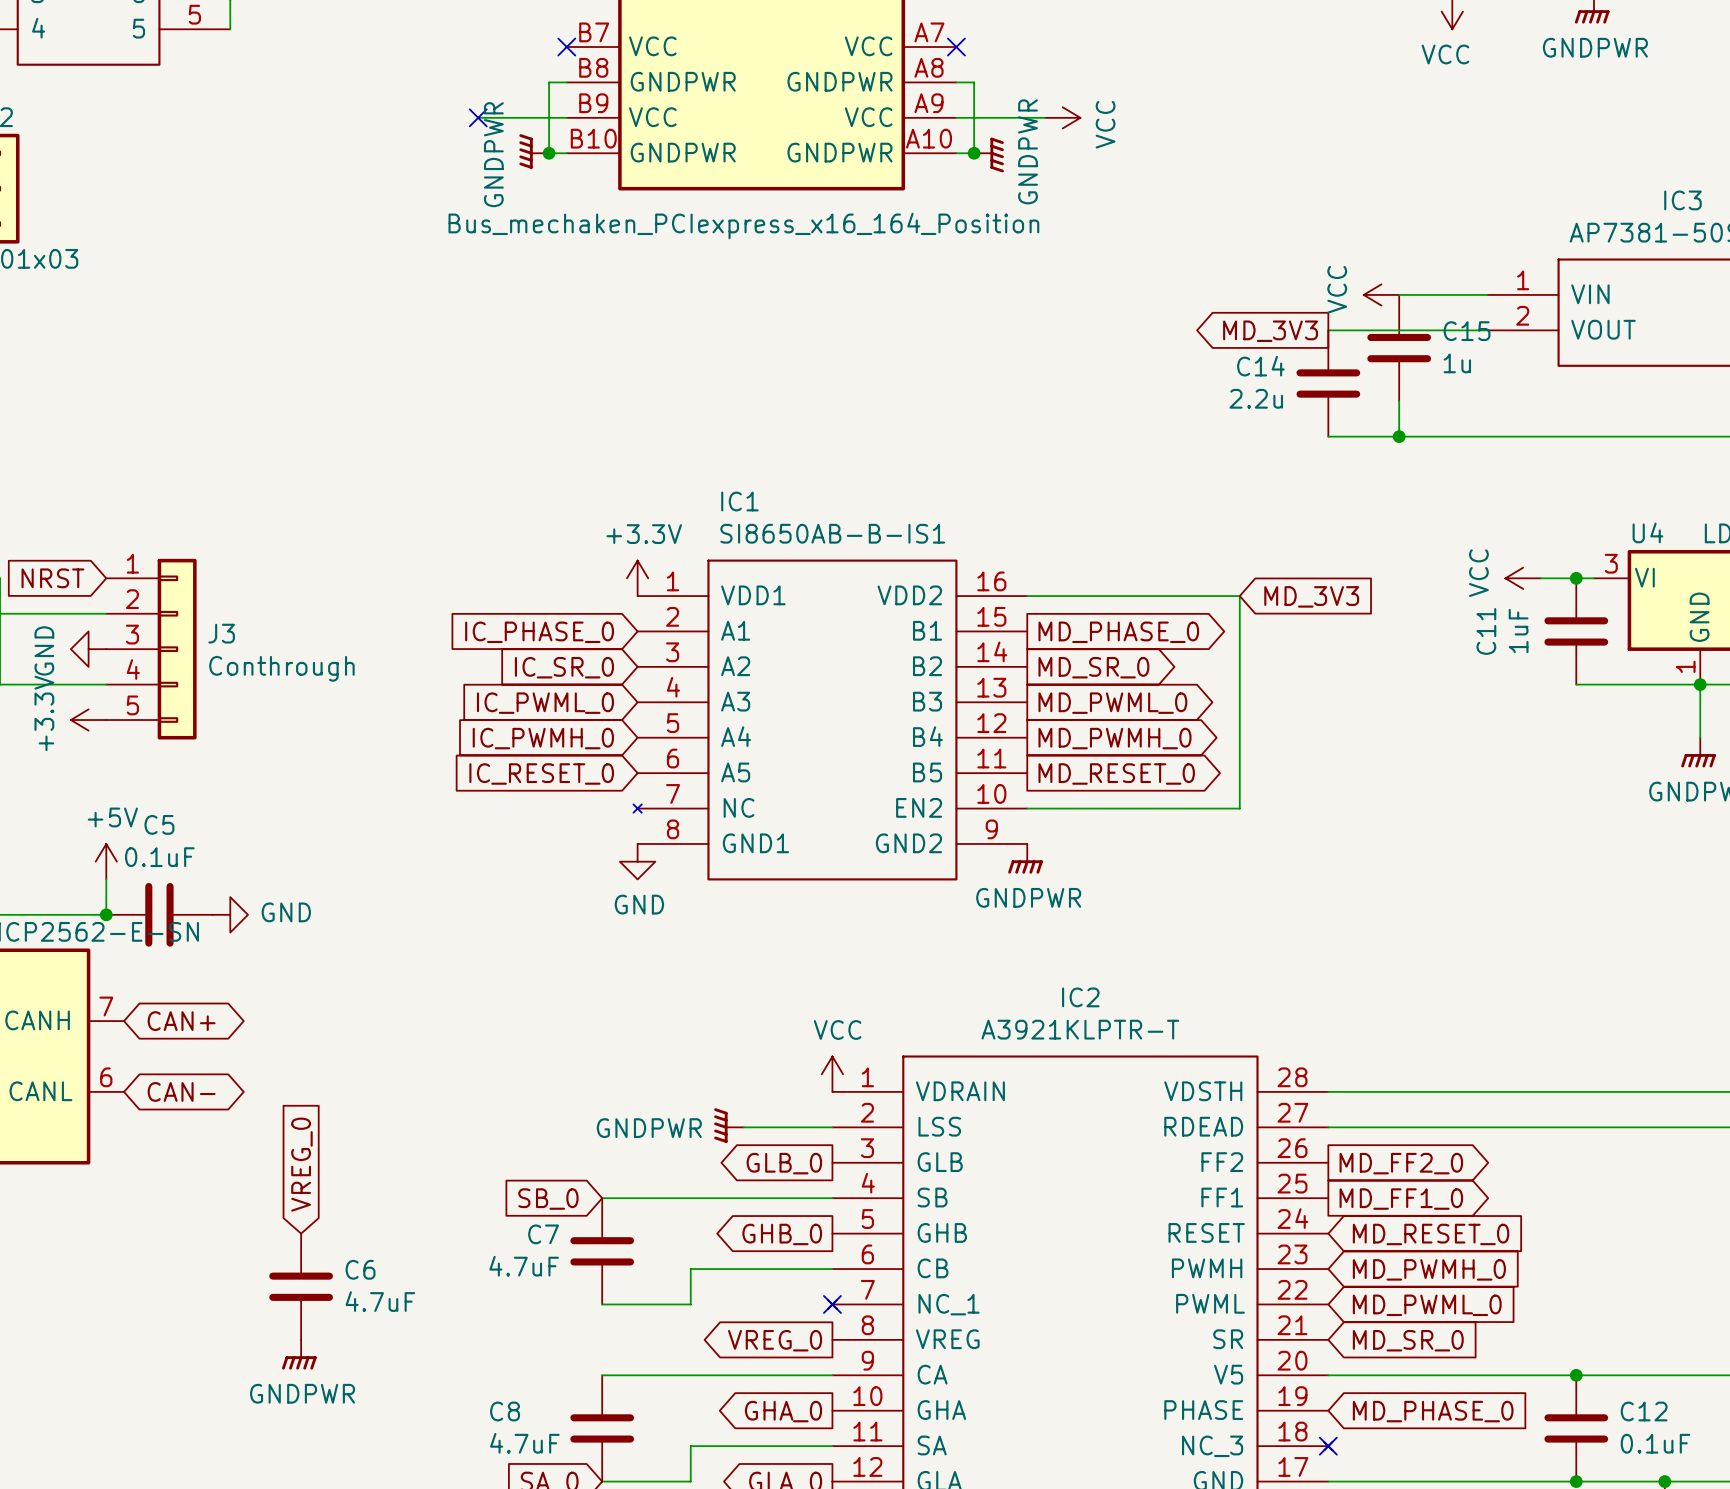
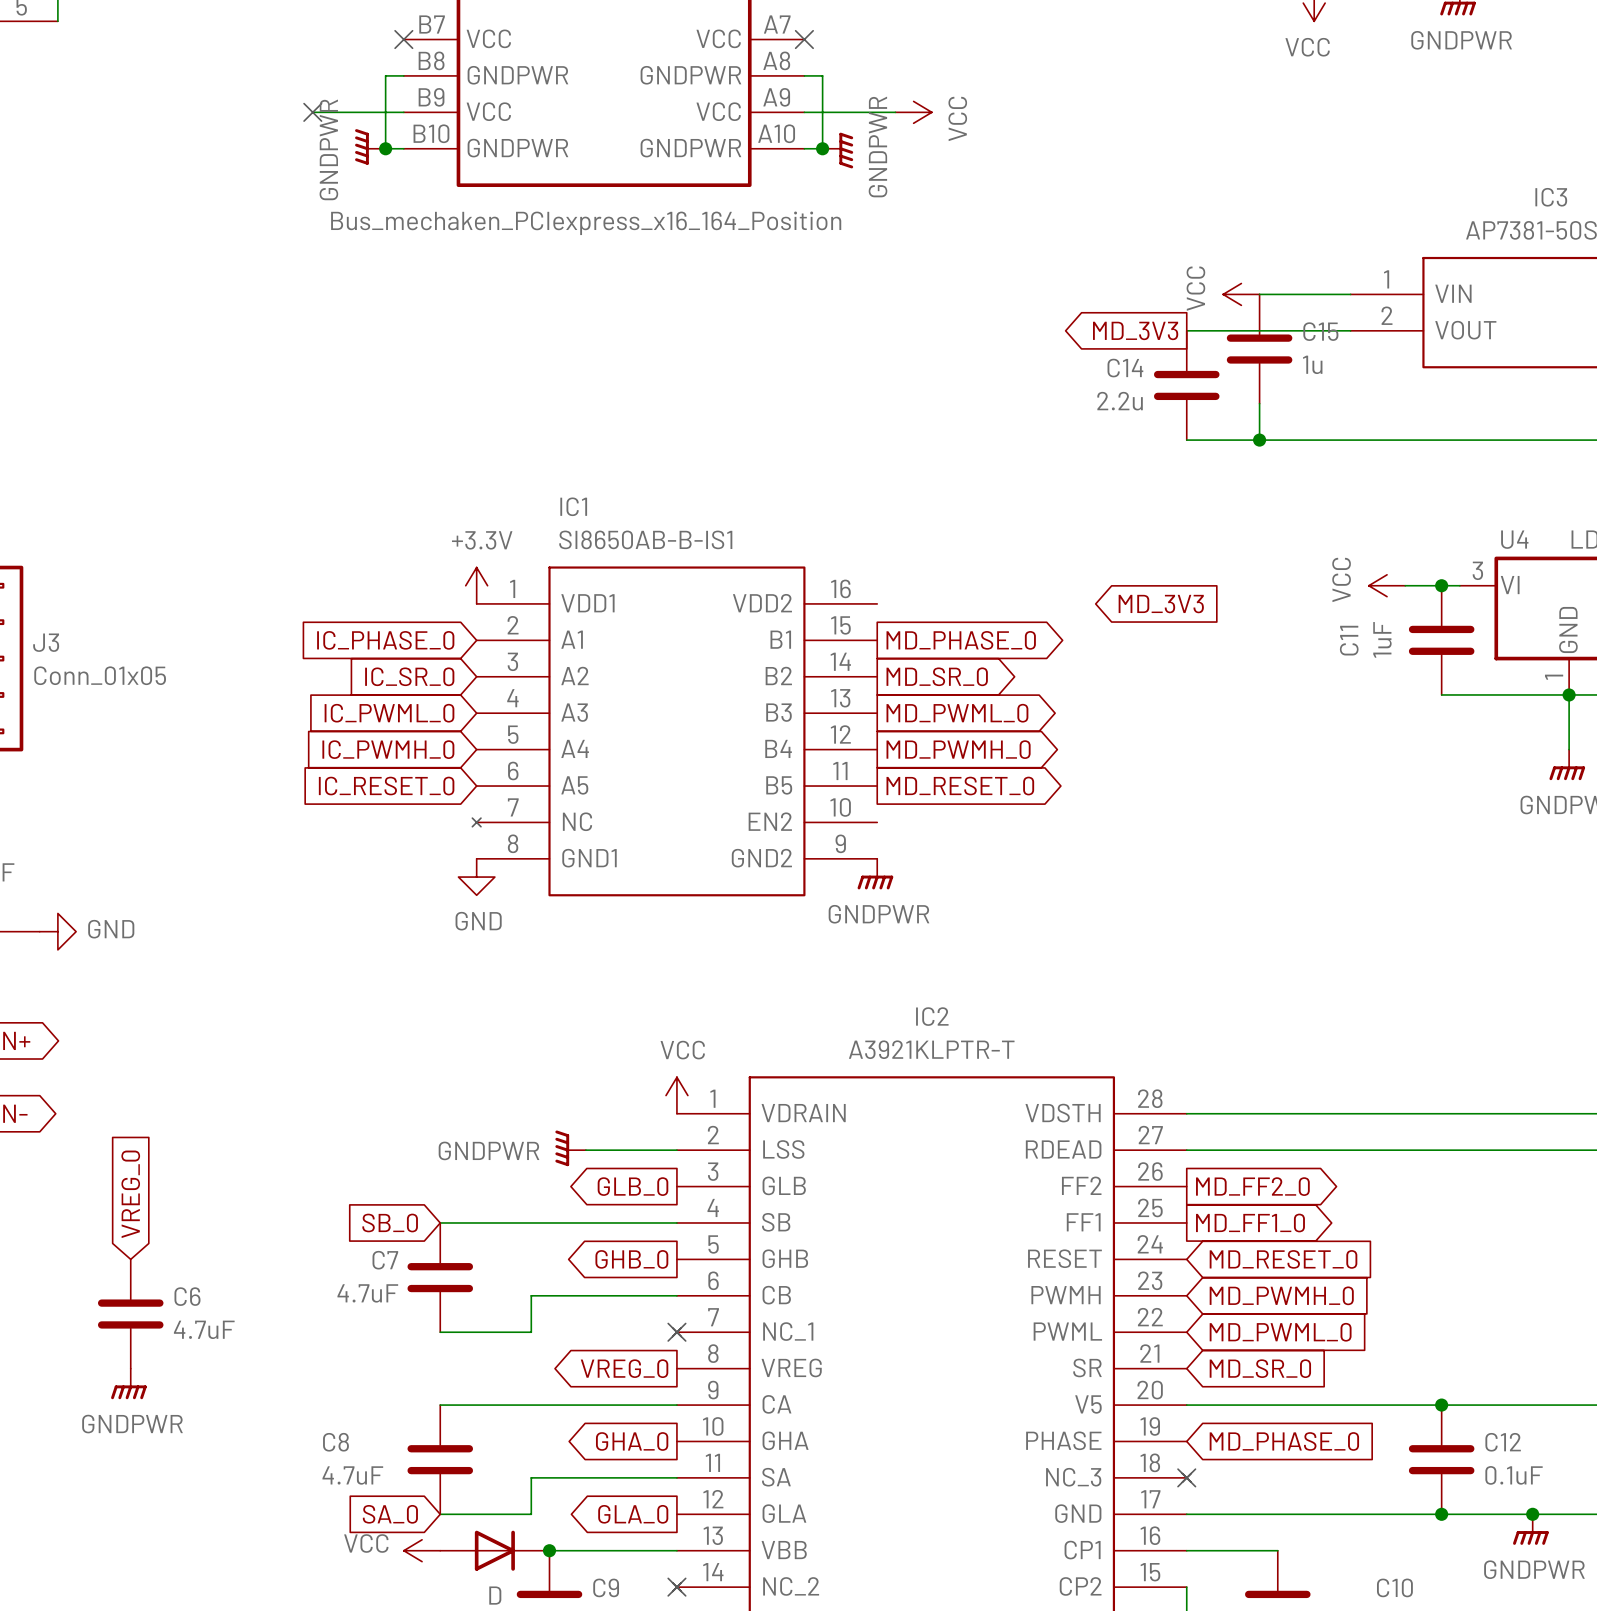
wire: (1027, 596) (1239, 596) (1239, 808) (1027, 808) -> none
J3 value: Conthrough (281, 668) -> Conn_01x05 (100, 675)

